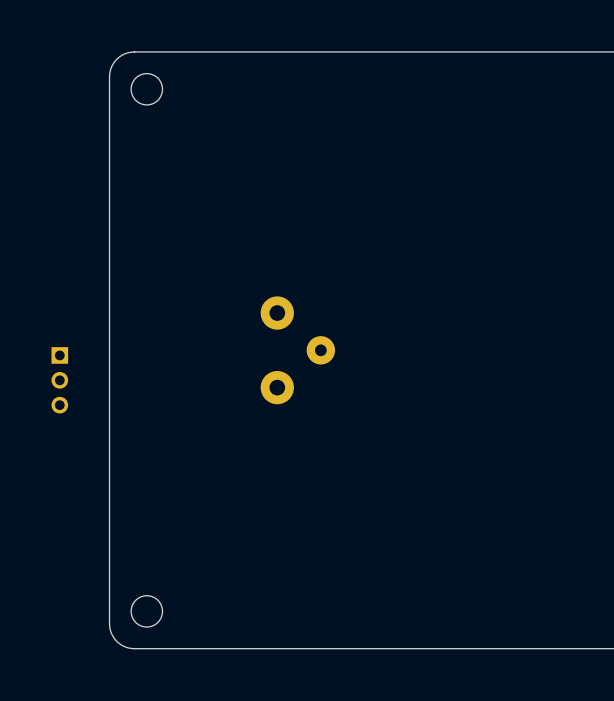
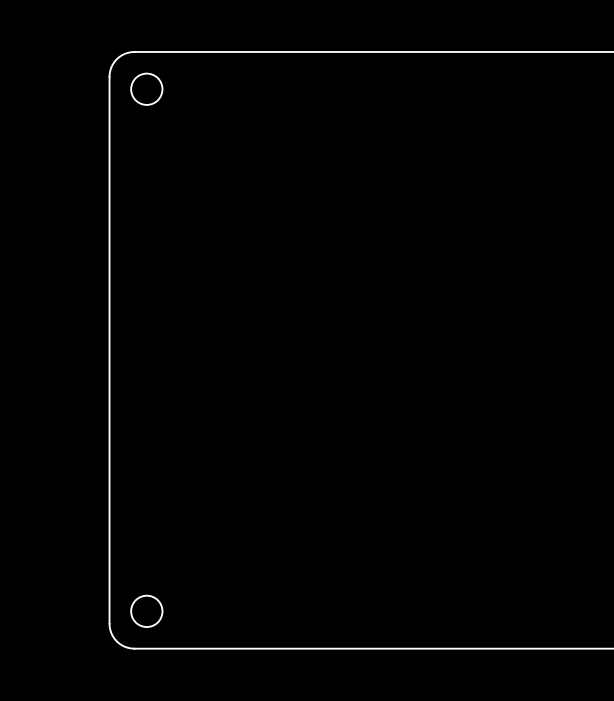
part: (297, 350) -> none
part: (59, 380) -> none

